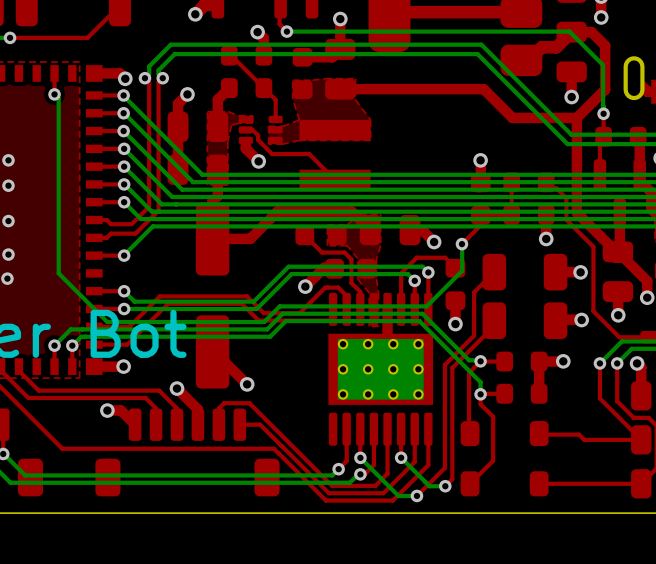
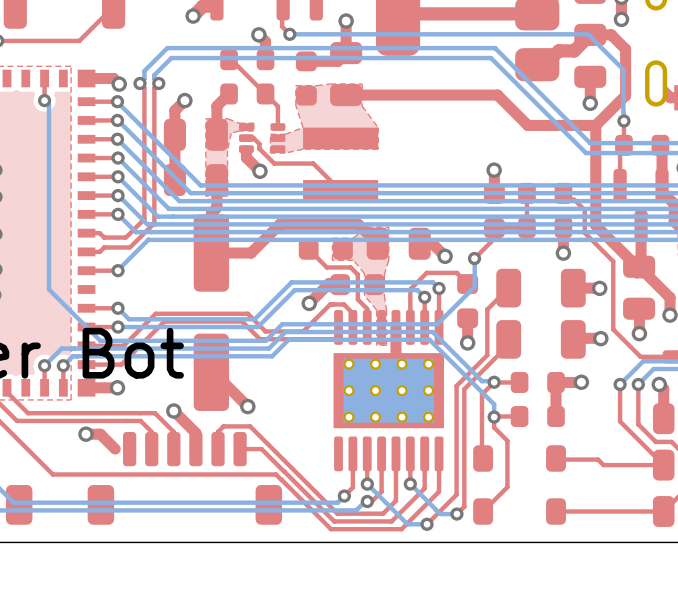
top track: (107, 410) (121, 410) (135, 424) -> (86, 434) (100, 434) (115, 449)
via position: (107, 410) -> (86, 434)

